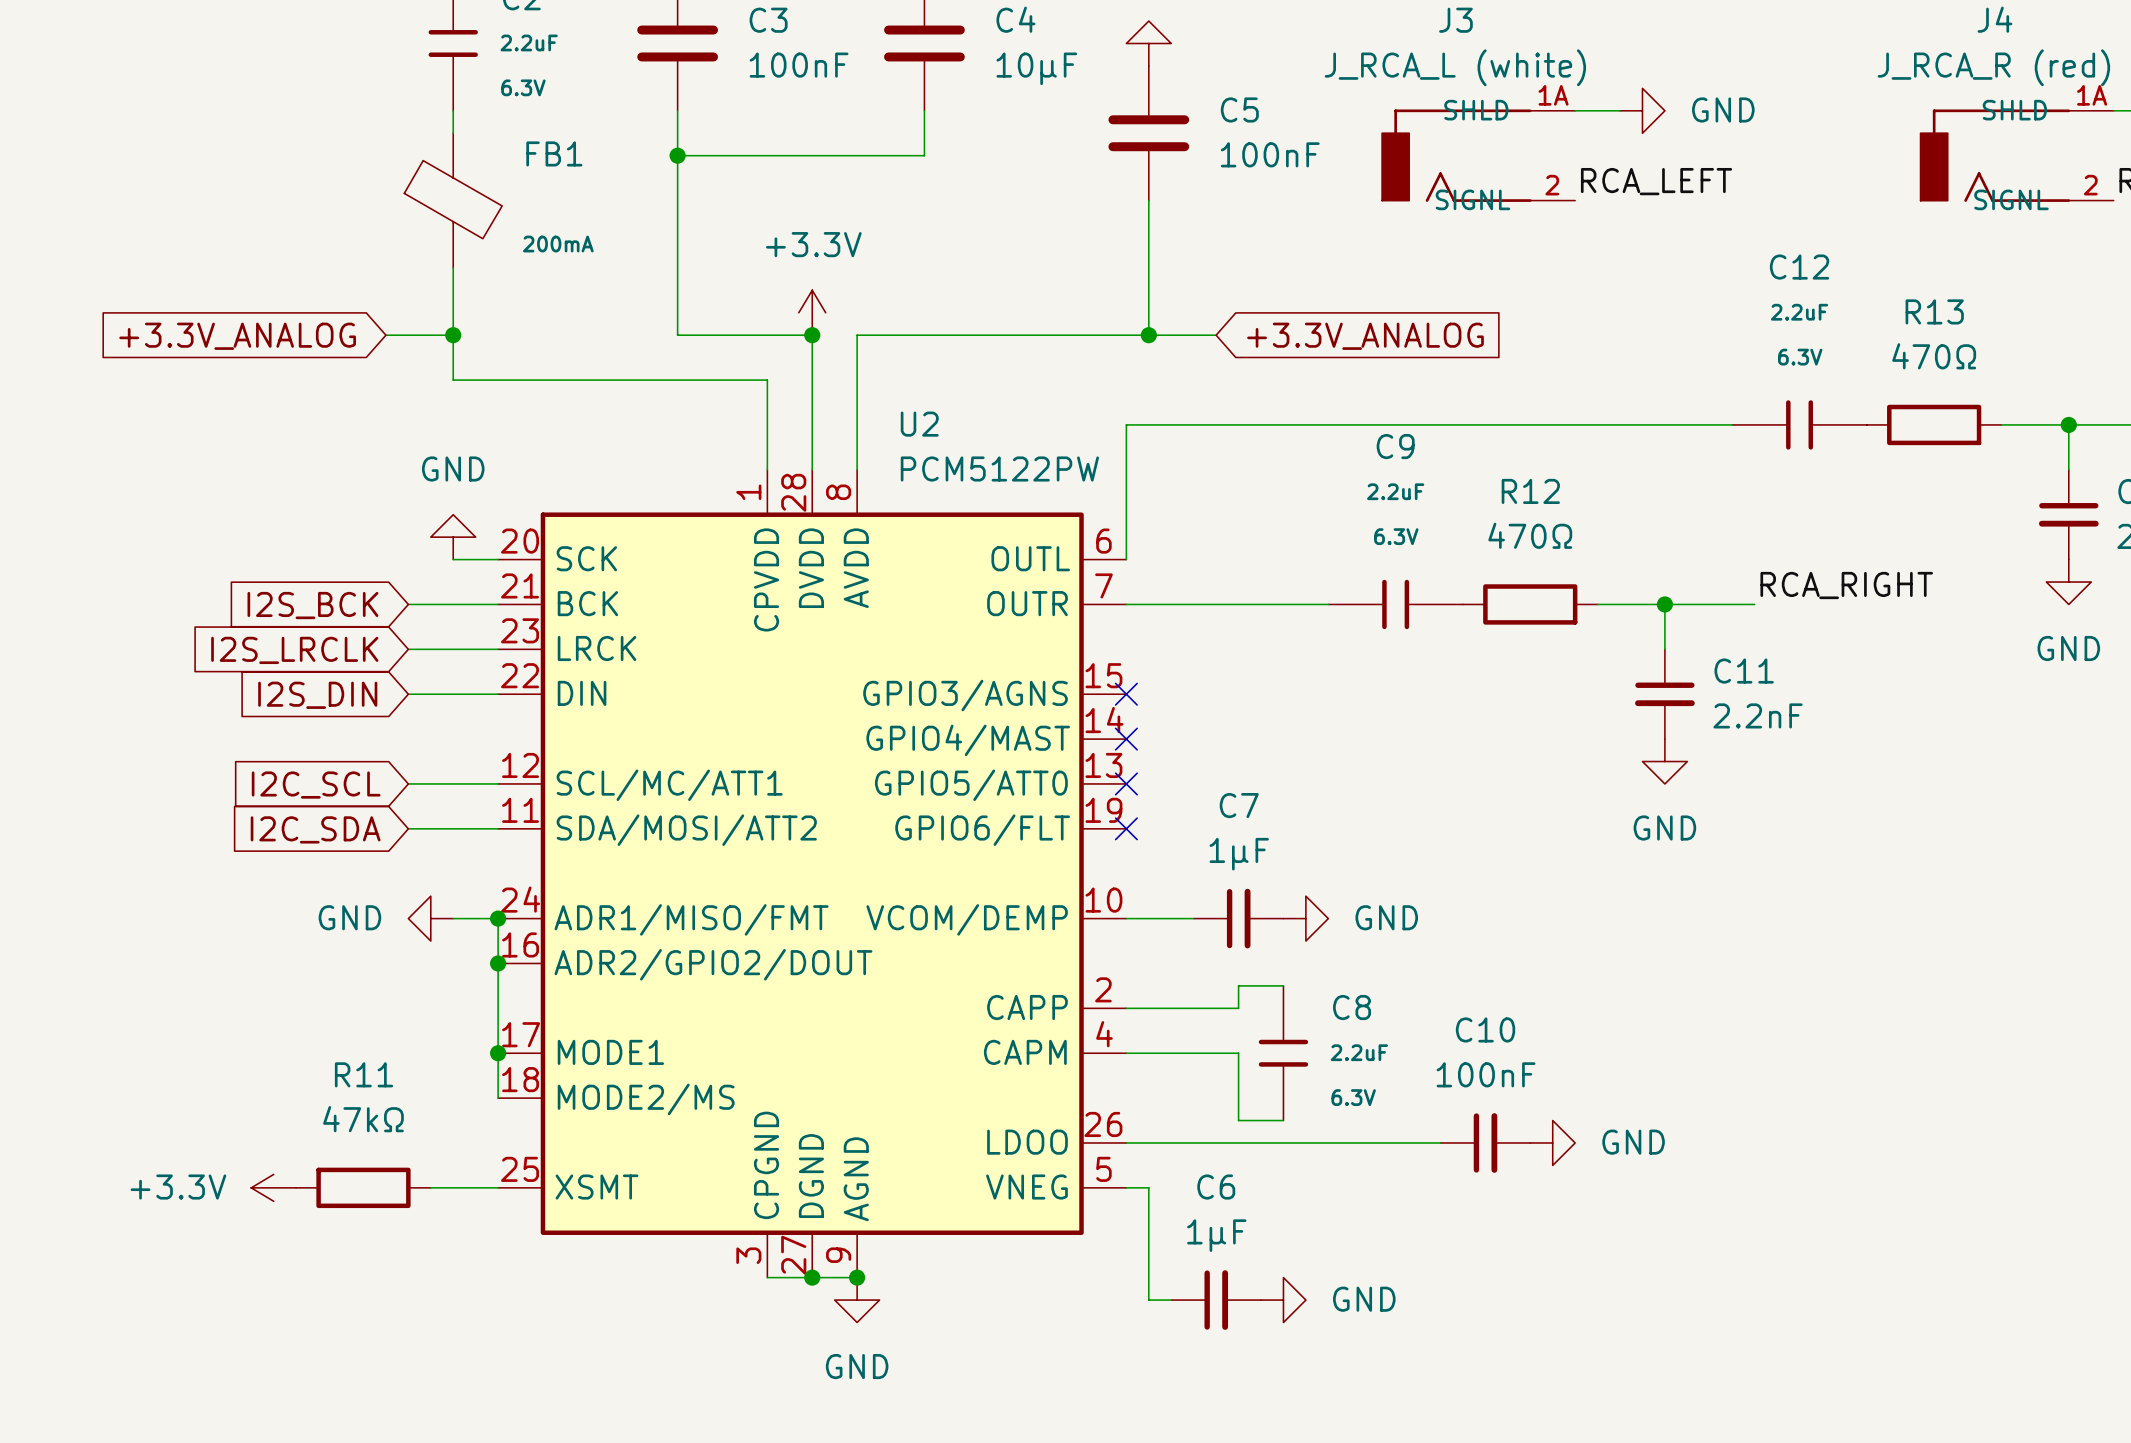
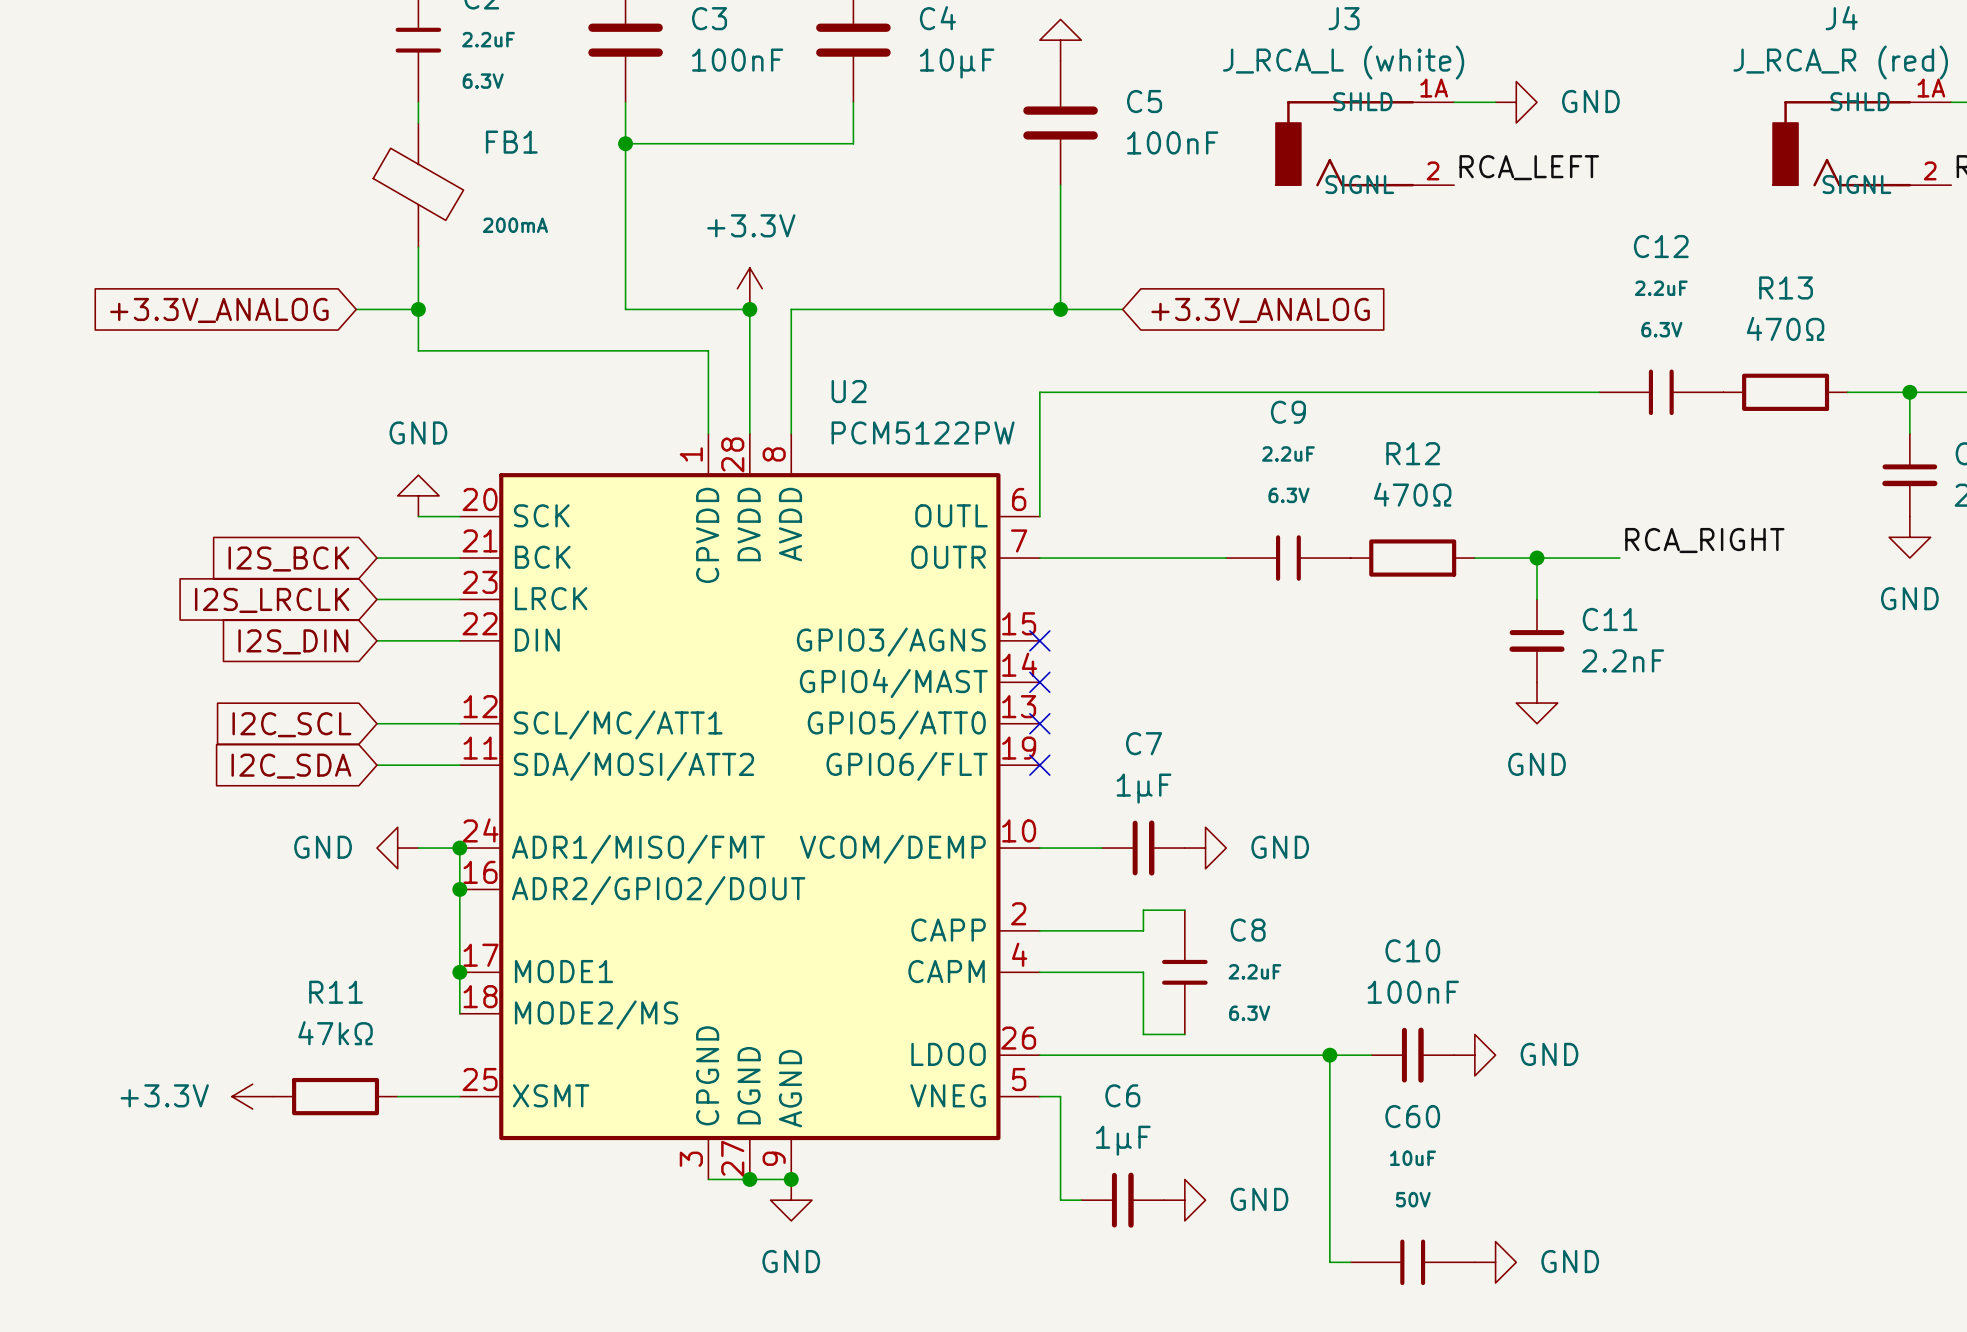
junction: none -> (1329, 1055)
wire: none -> (1371, 1055) (1329, 1055) (1329, 1262) (1350, 1262)
C10 position: (1485, 1142) -> (1412, 1055)
power symbol position: GND (1552, 1142) -> GND (1474, 1055)
C60: none -> 10uF (1412, 1262)
power symbol: none -> GND (1495, 1262)

